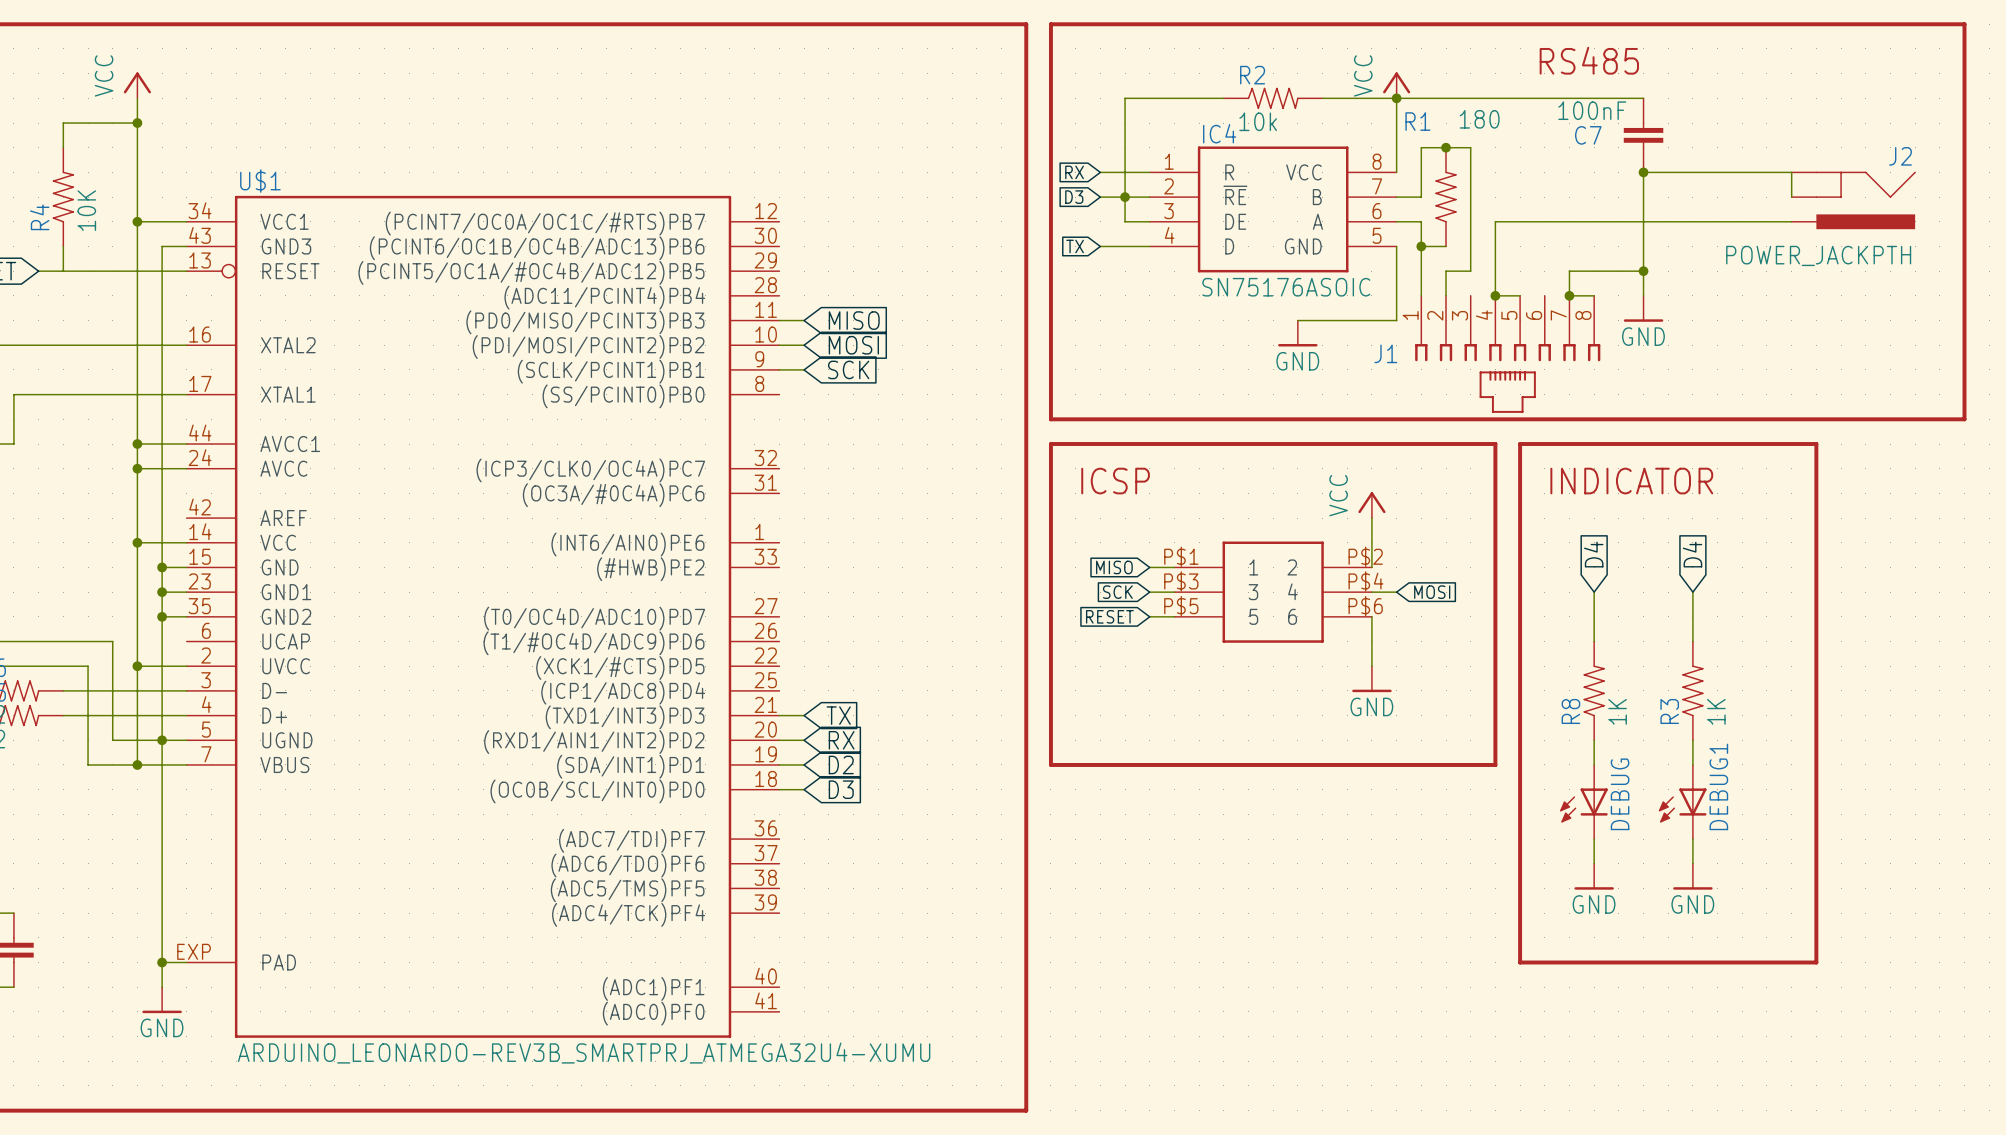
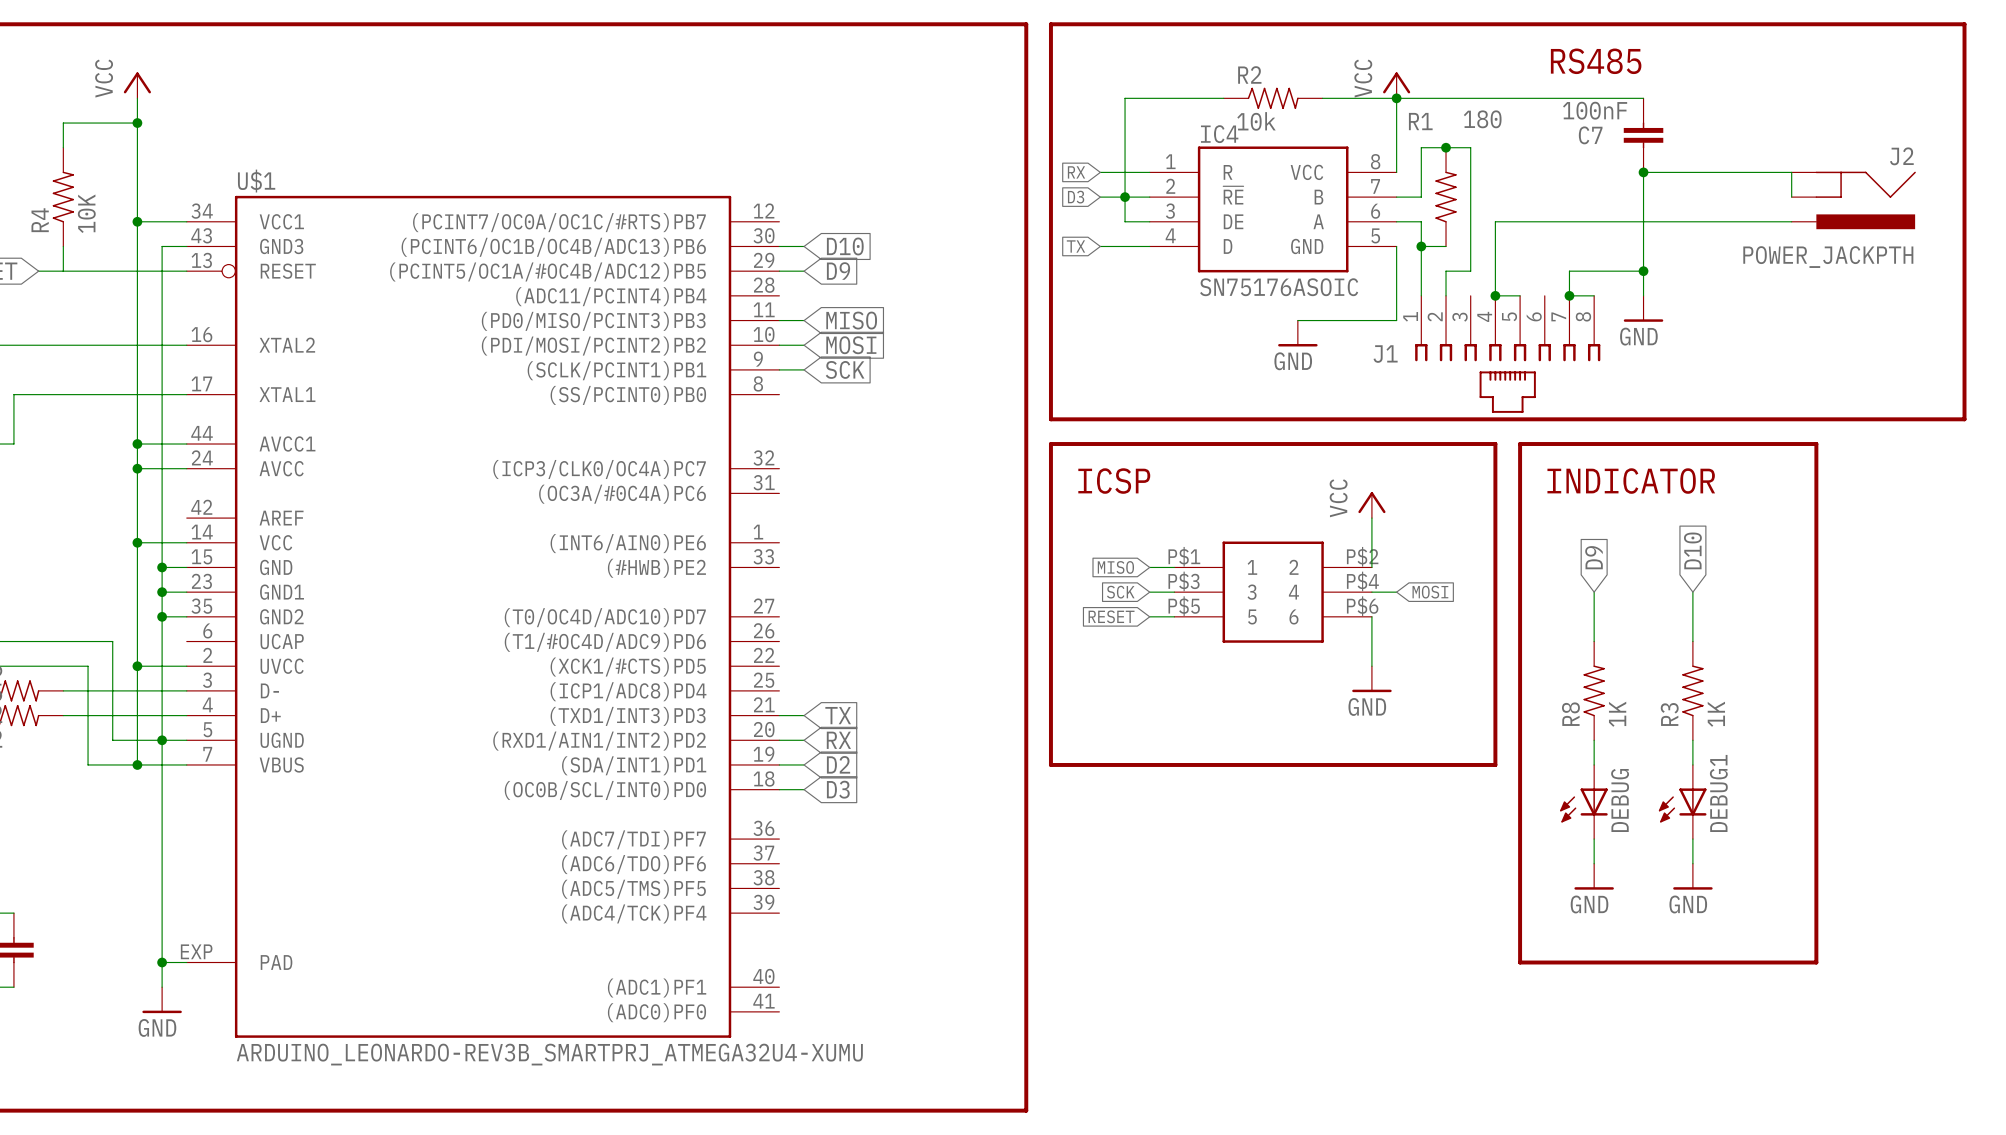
wire: none -> (779, 246) (804, 246)
global label: none -> D10 (845, 246)
wire: none -> (779, 271) (804, 271)
global label: none -> D9 (838, 271)
global label: D4 (1593, 554) -> D9 (1594, 557)
global label: D4 (1692, 554) -> D10 (1692, 550)

